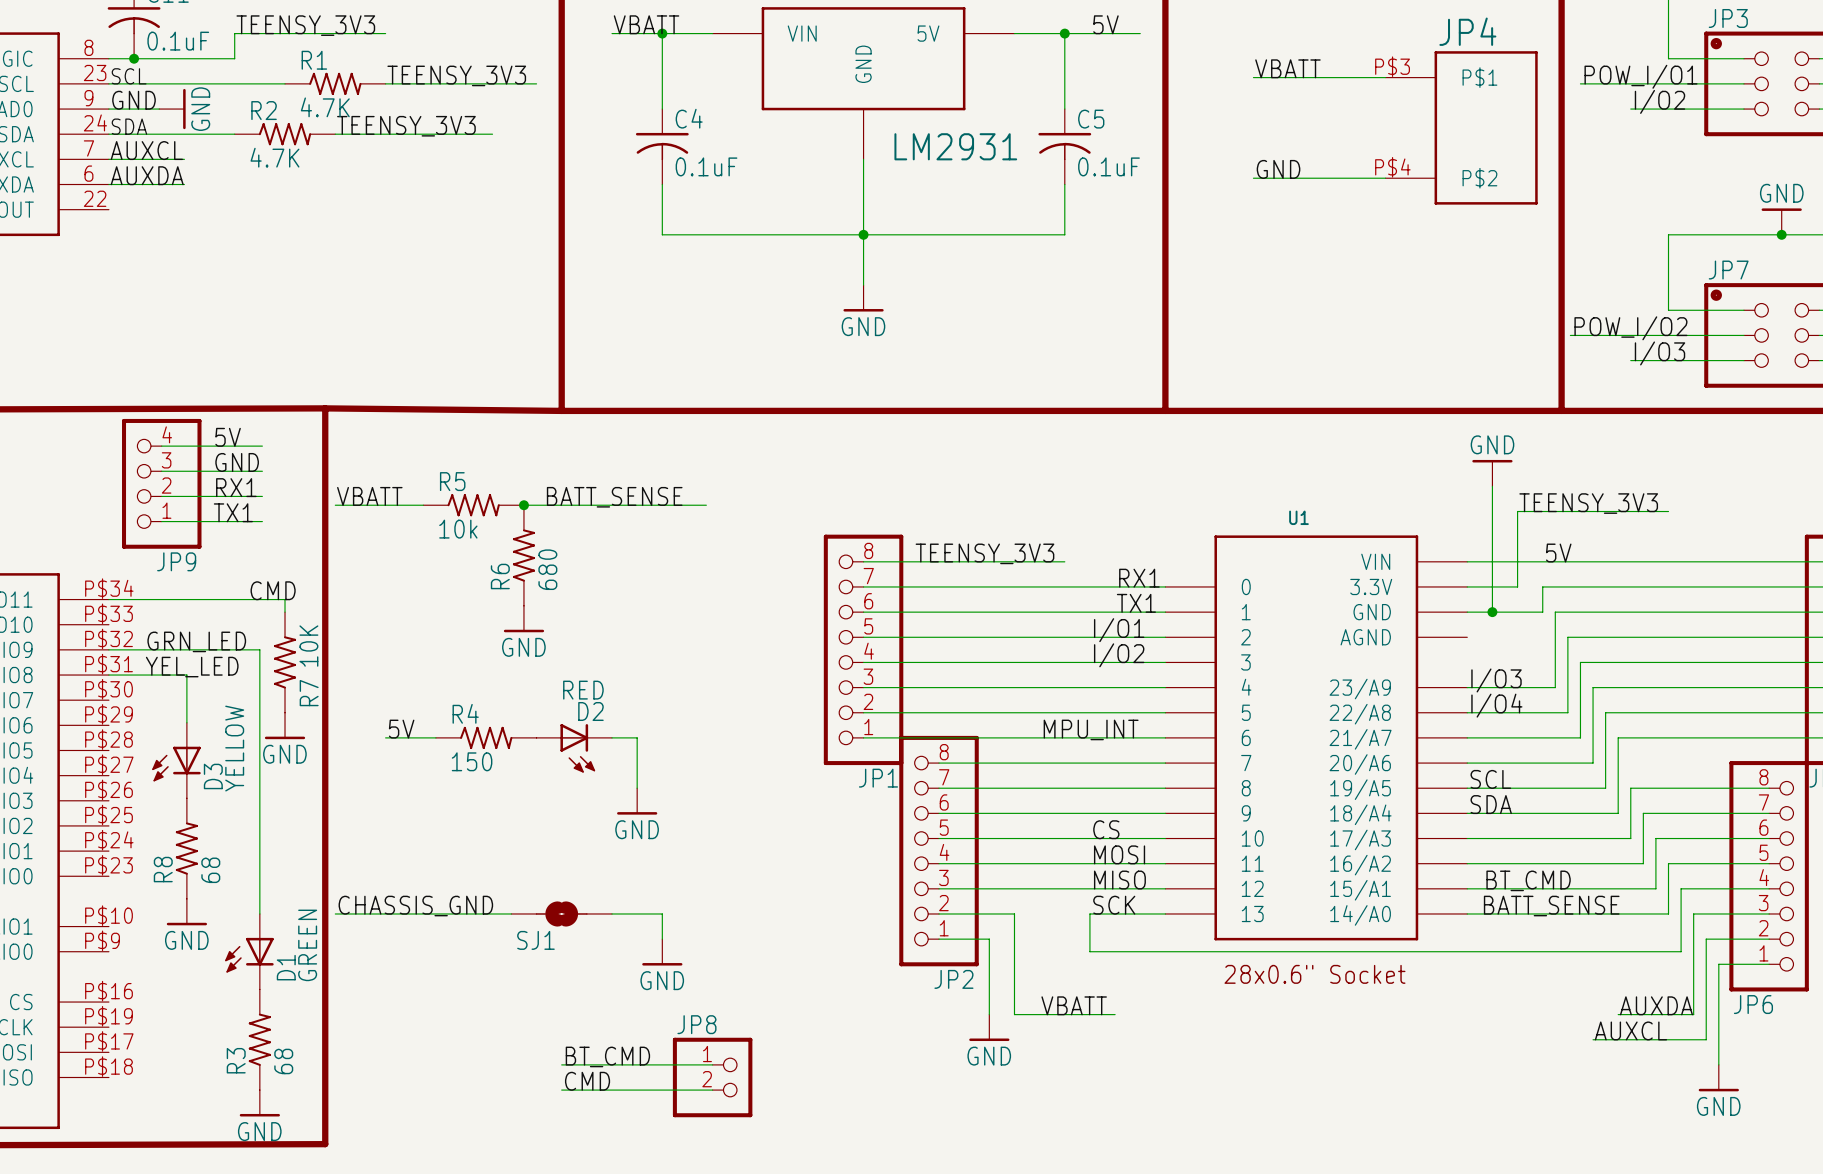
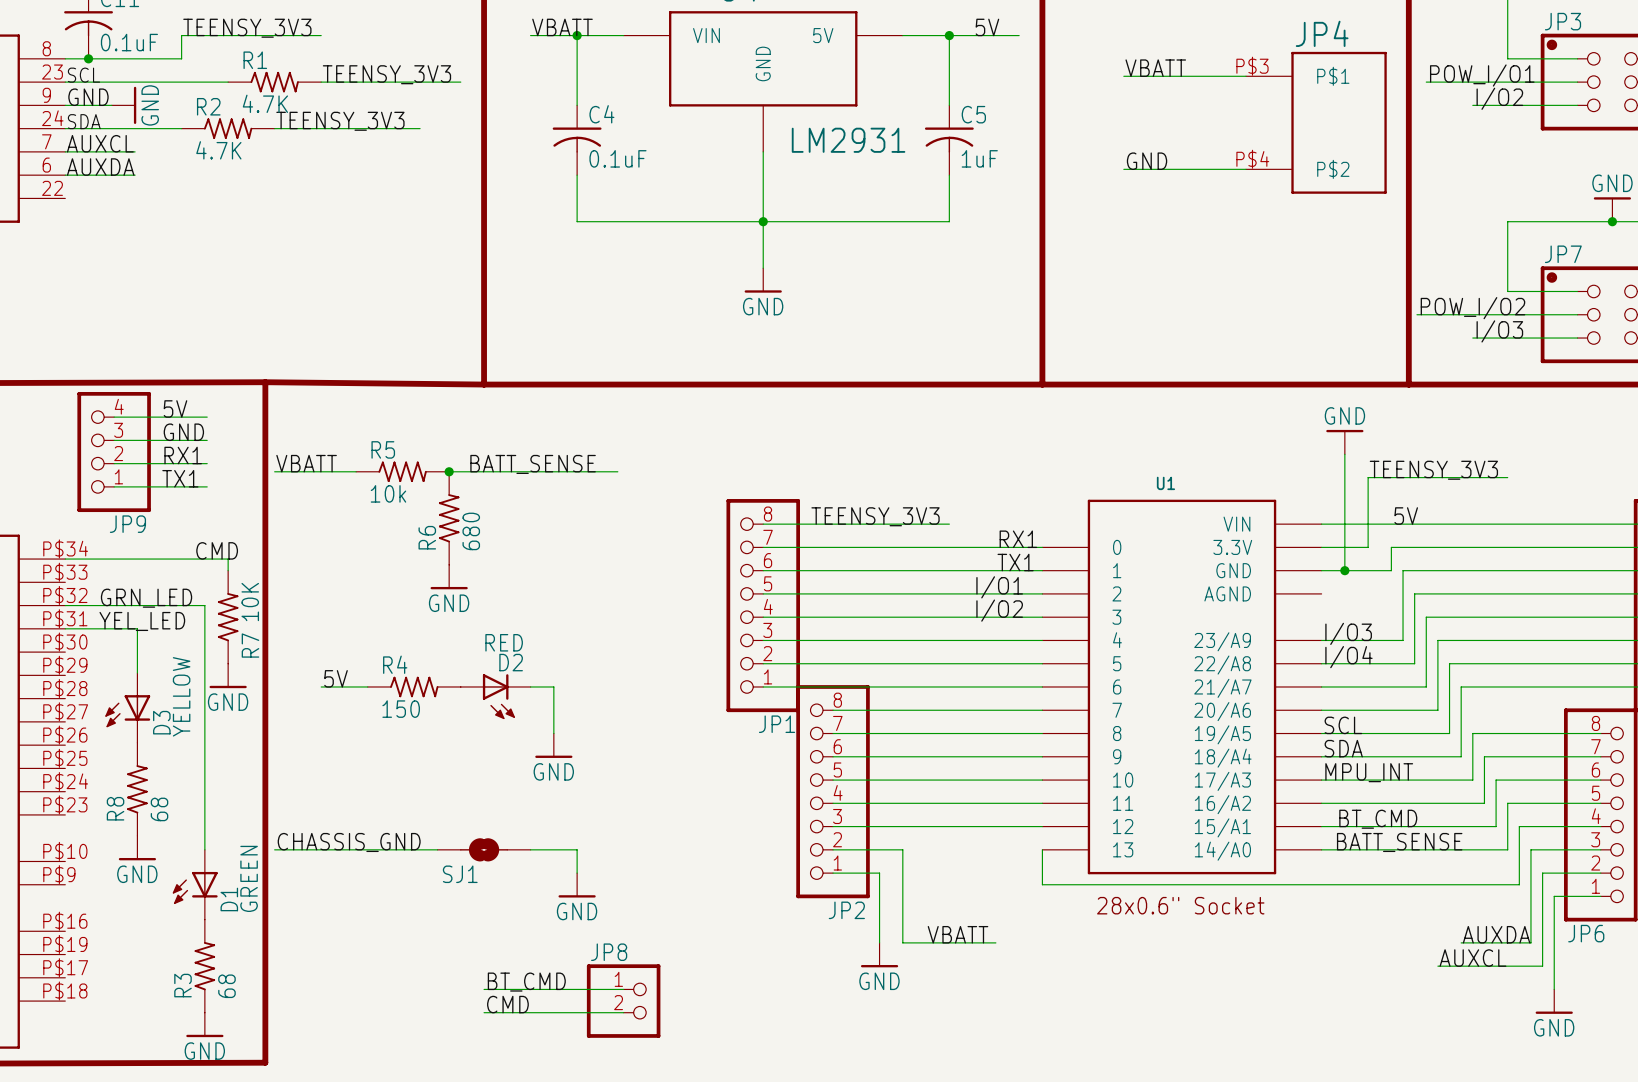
C5 value: 0.1uF (1108, 166) -> 1uF (979, 158)
label: MPU_INT (1091, 729) -> none
label: CS (1106, 829) -> none
label: none -> MPU_INT (1369, 772)
label: MOSI (1119, 854) -> none
label: MISO (1119, 880) -> none
label: SCK (1114, 905) -> none
wire: (1165, 913) (1089, 913) (1089, 951) (1165, 951) -> (1042, 849) (1042, 884)

